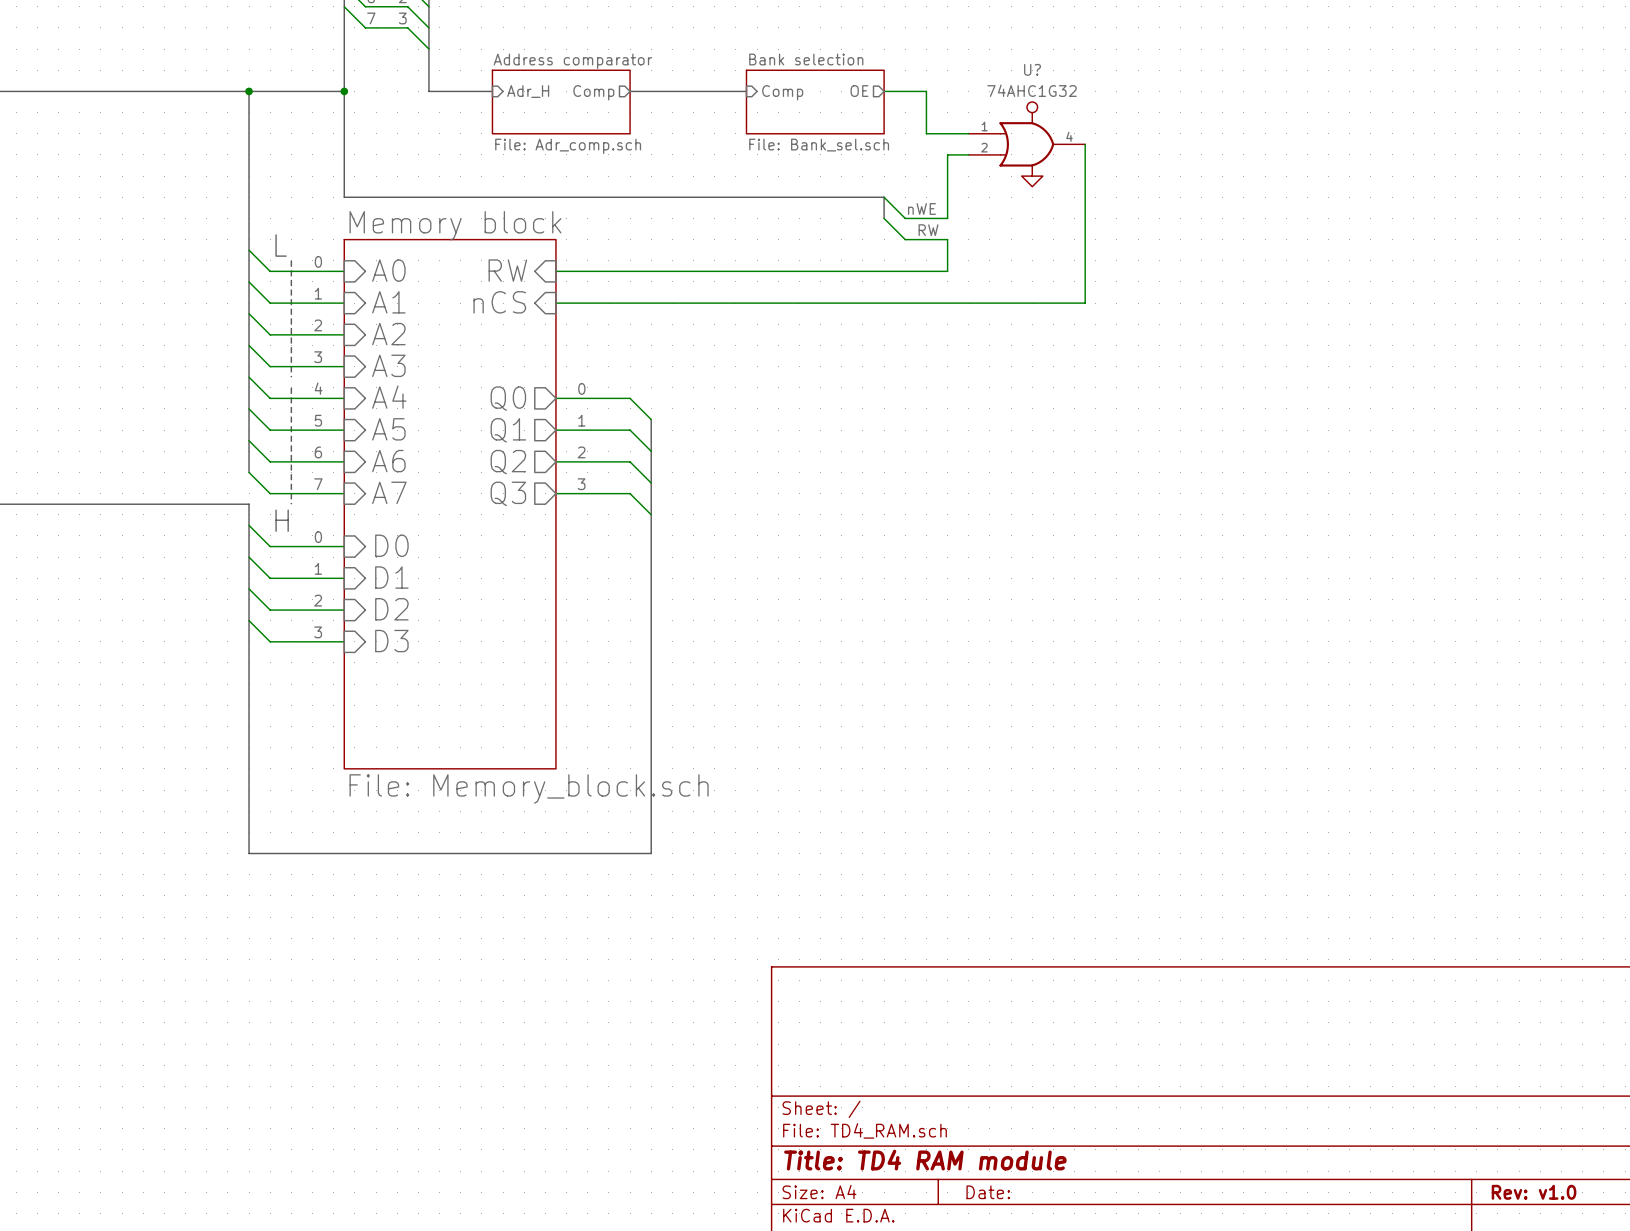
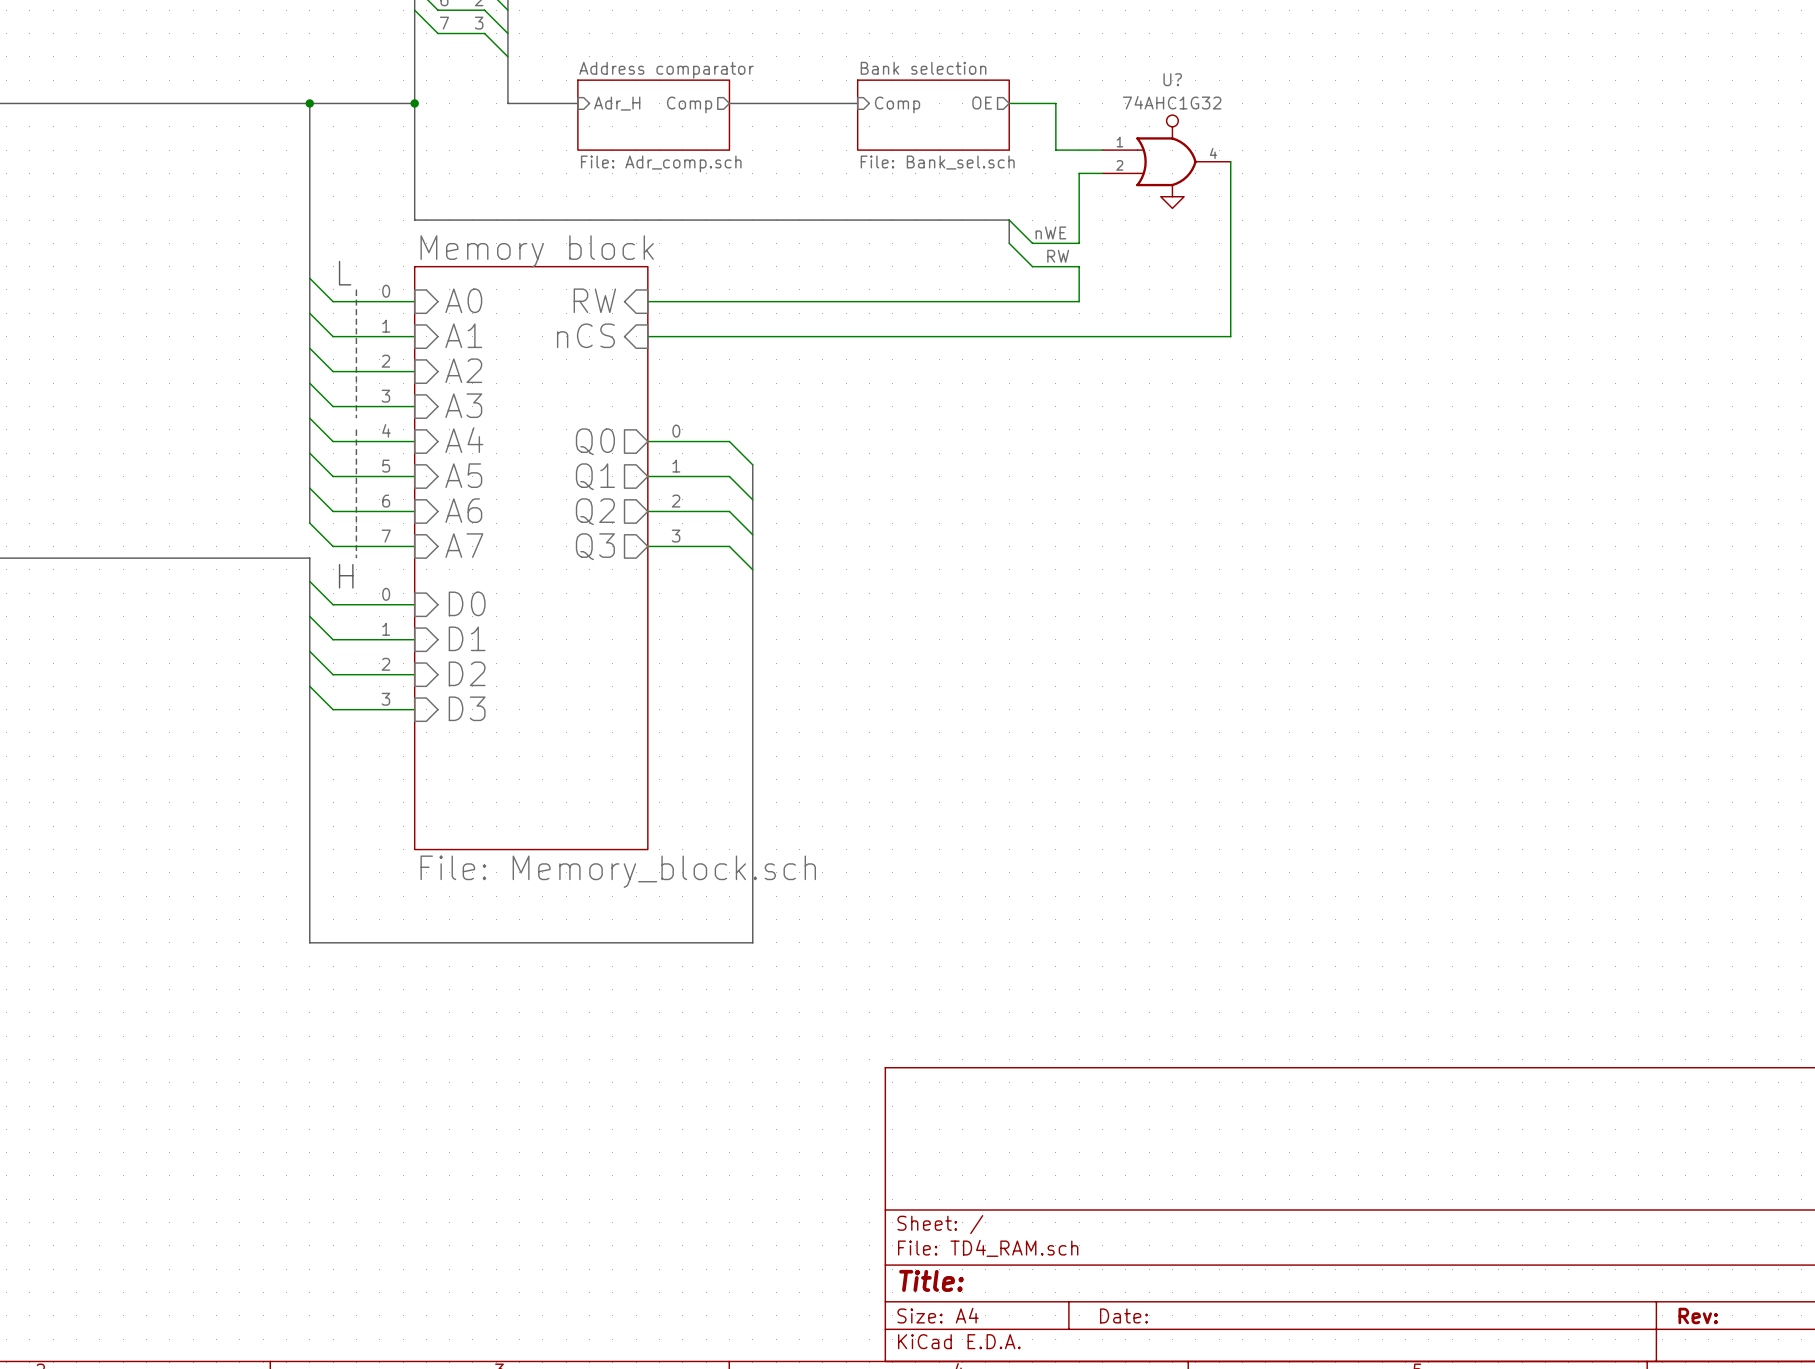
title block: Title: TD4 RAM module (925, 1160) -> Title: (931, 1280)
title block: Rev: v1.0 (1534, 1192) -> Rev: (1698, 1315)

